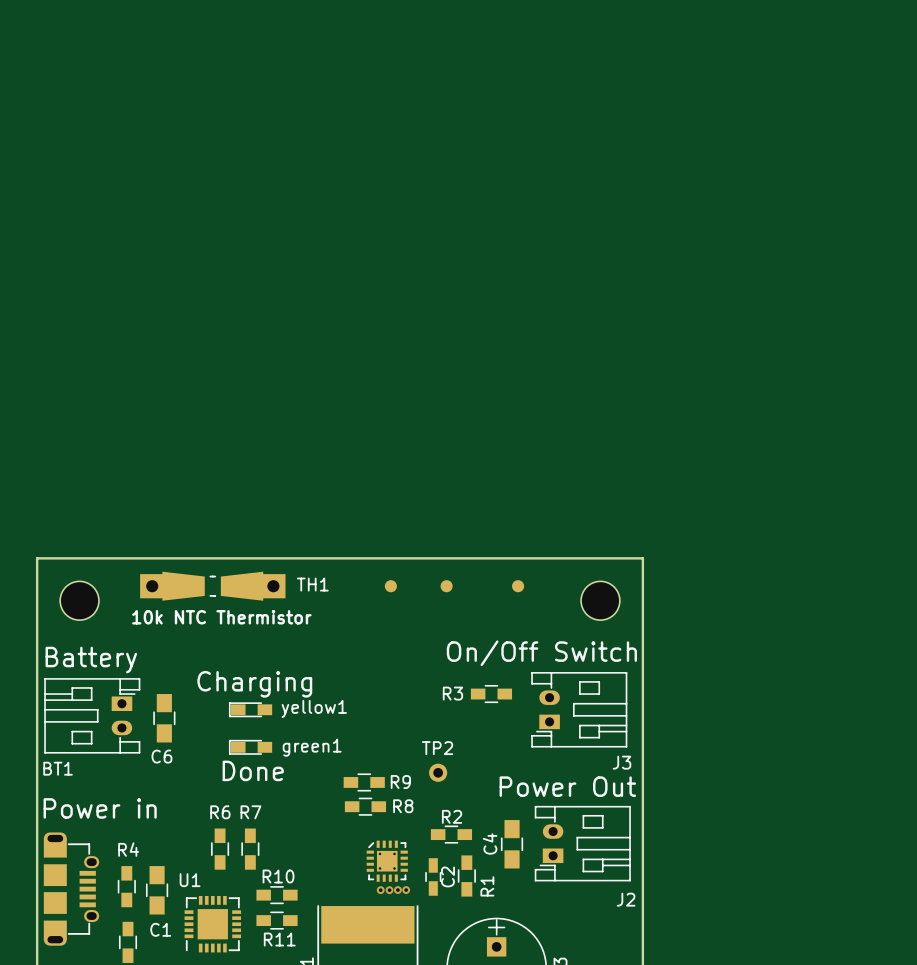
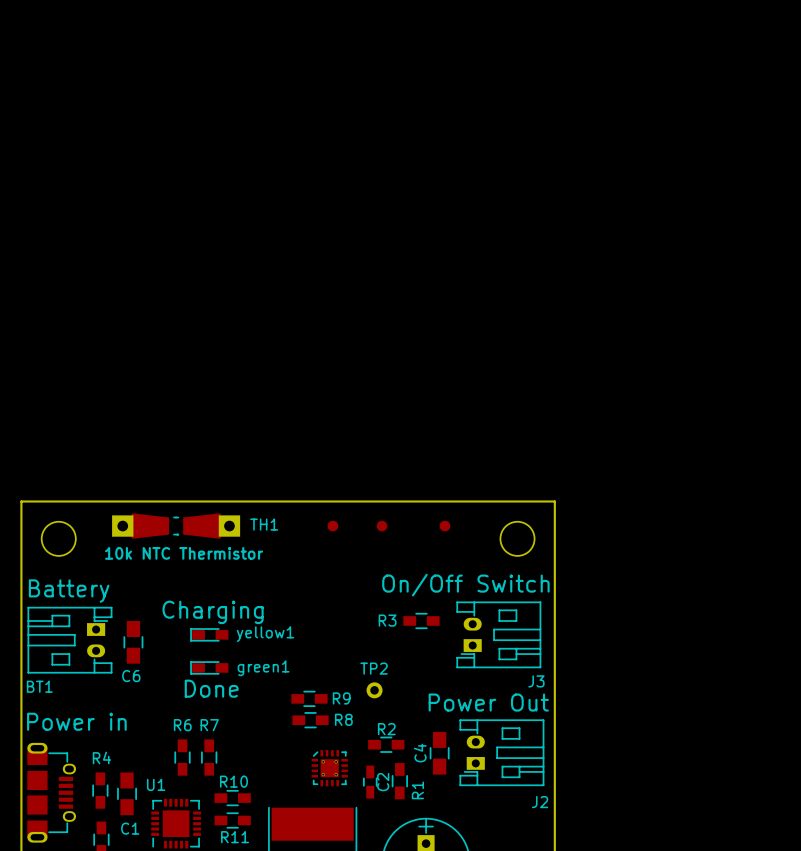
via: (380, 890) -> none
via: (389, 890) -> none
via: (397, 890) -> none
via: (406, 890) -> none

